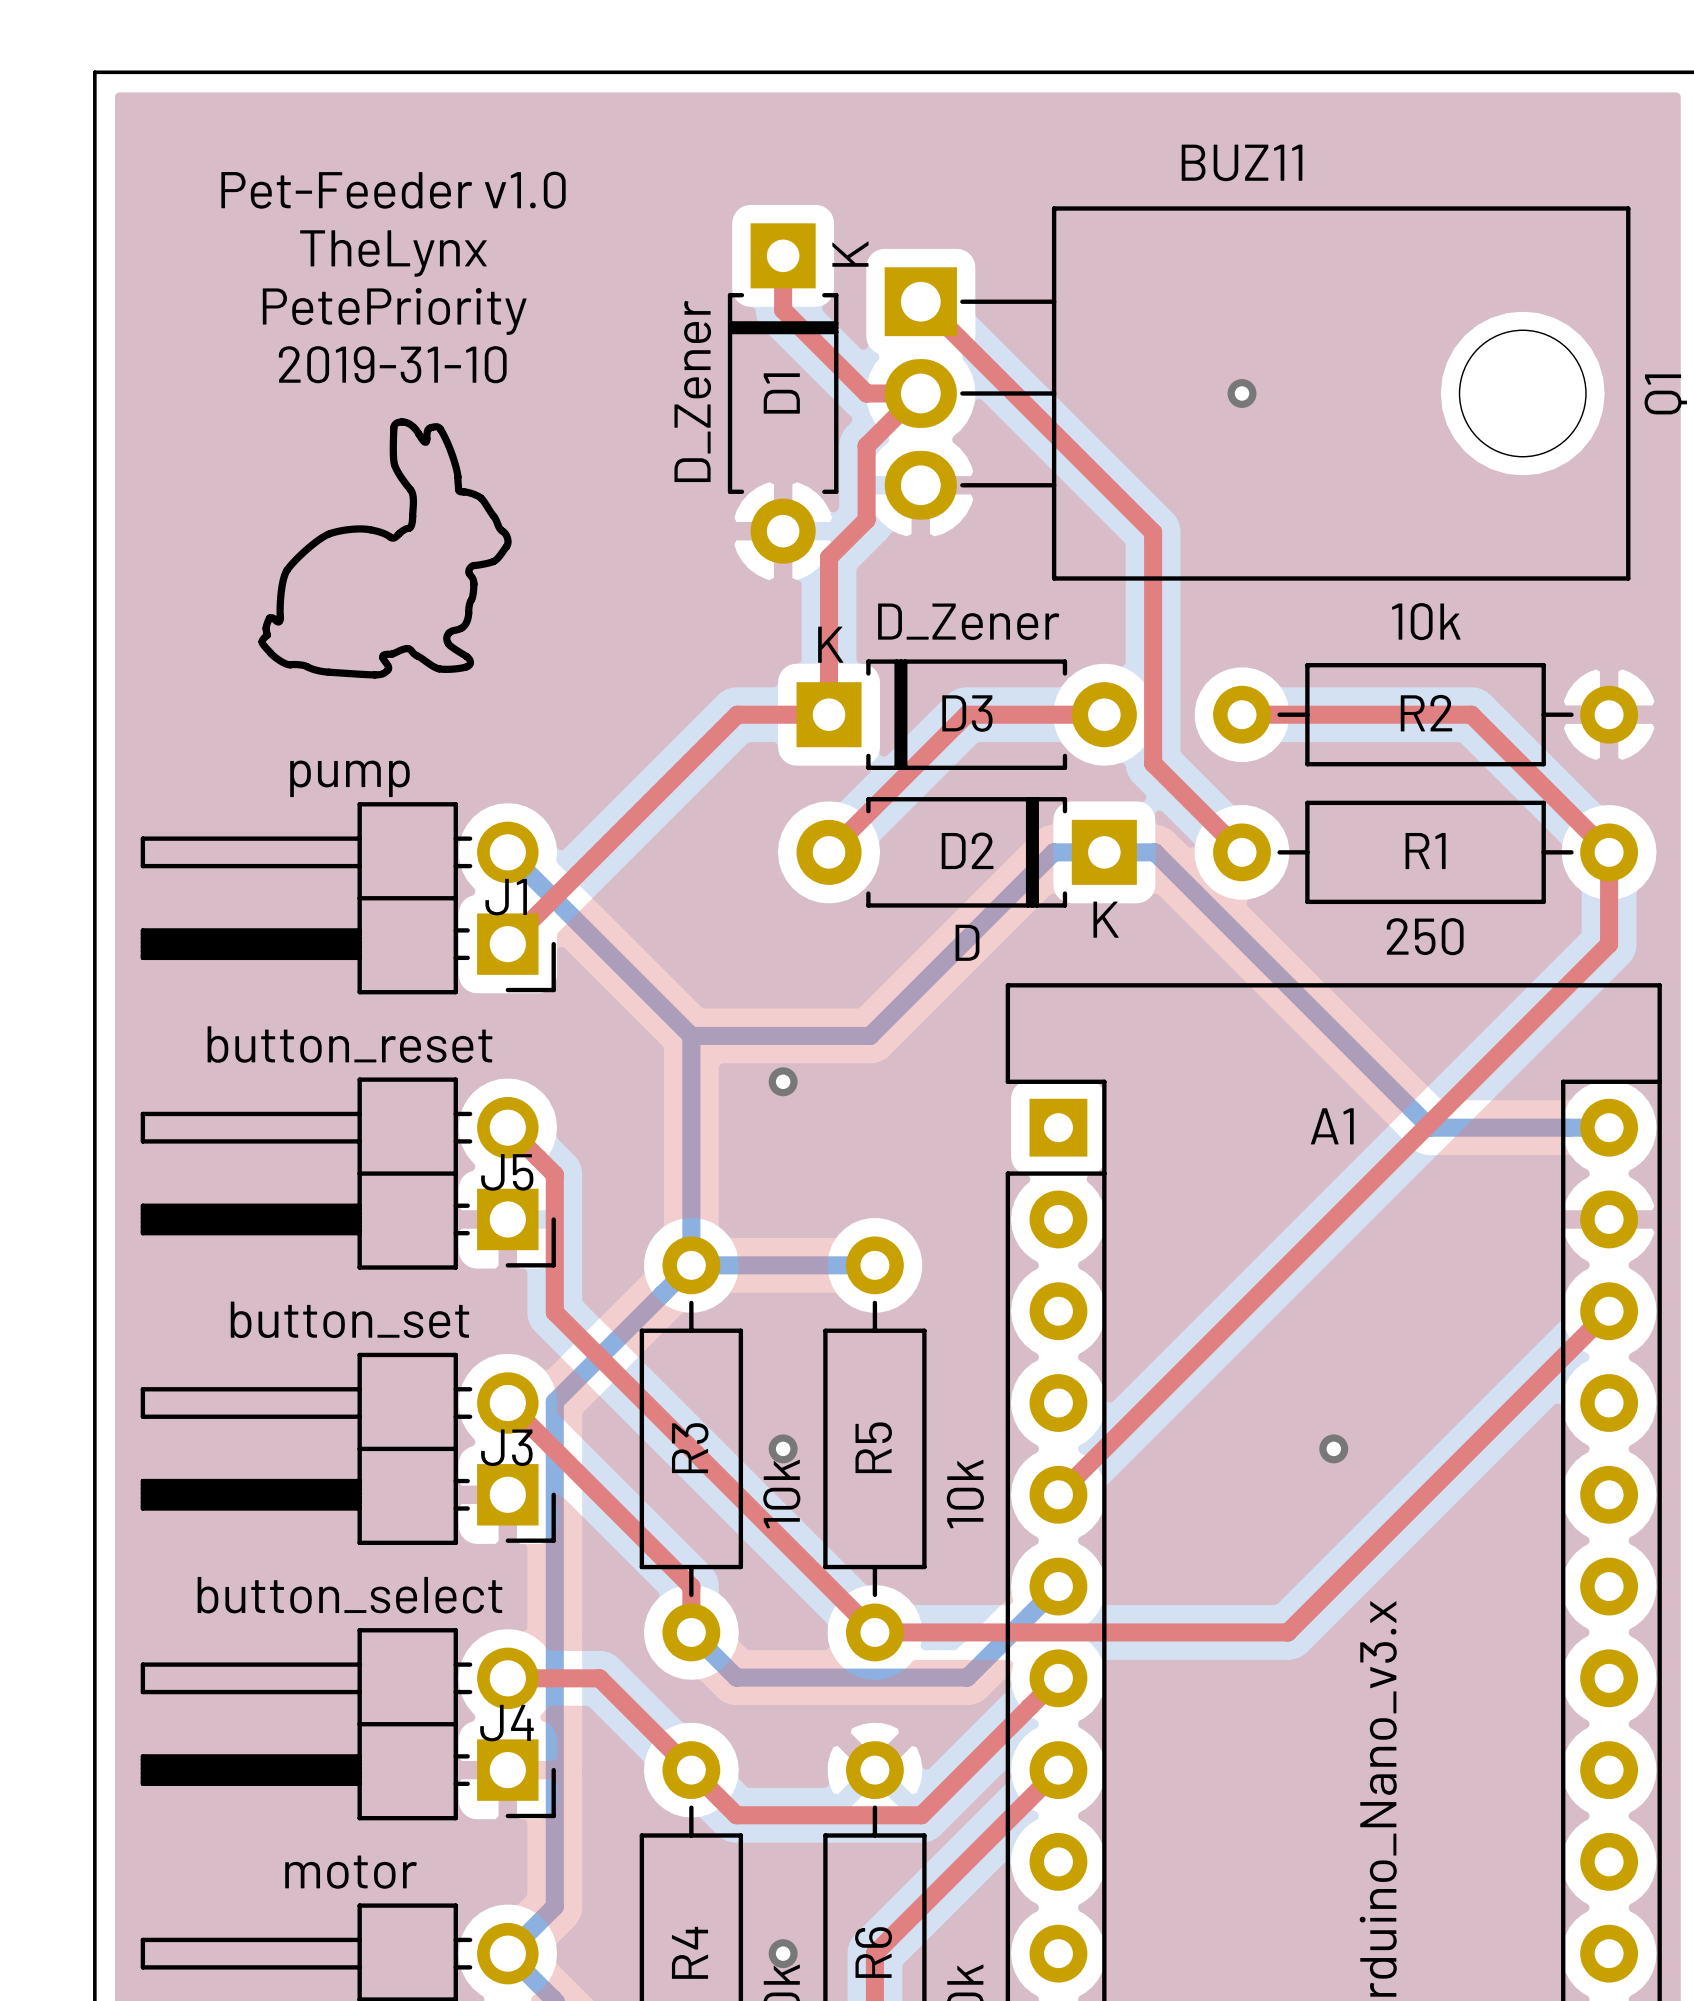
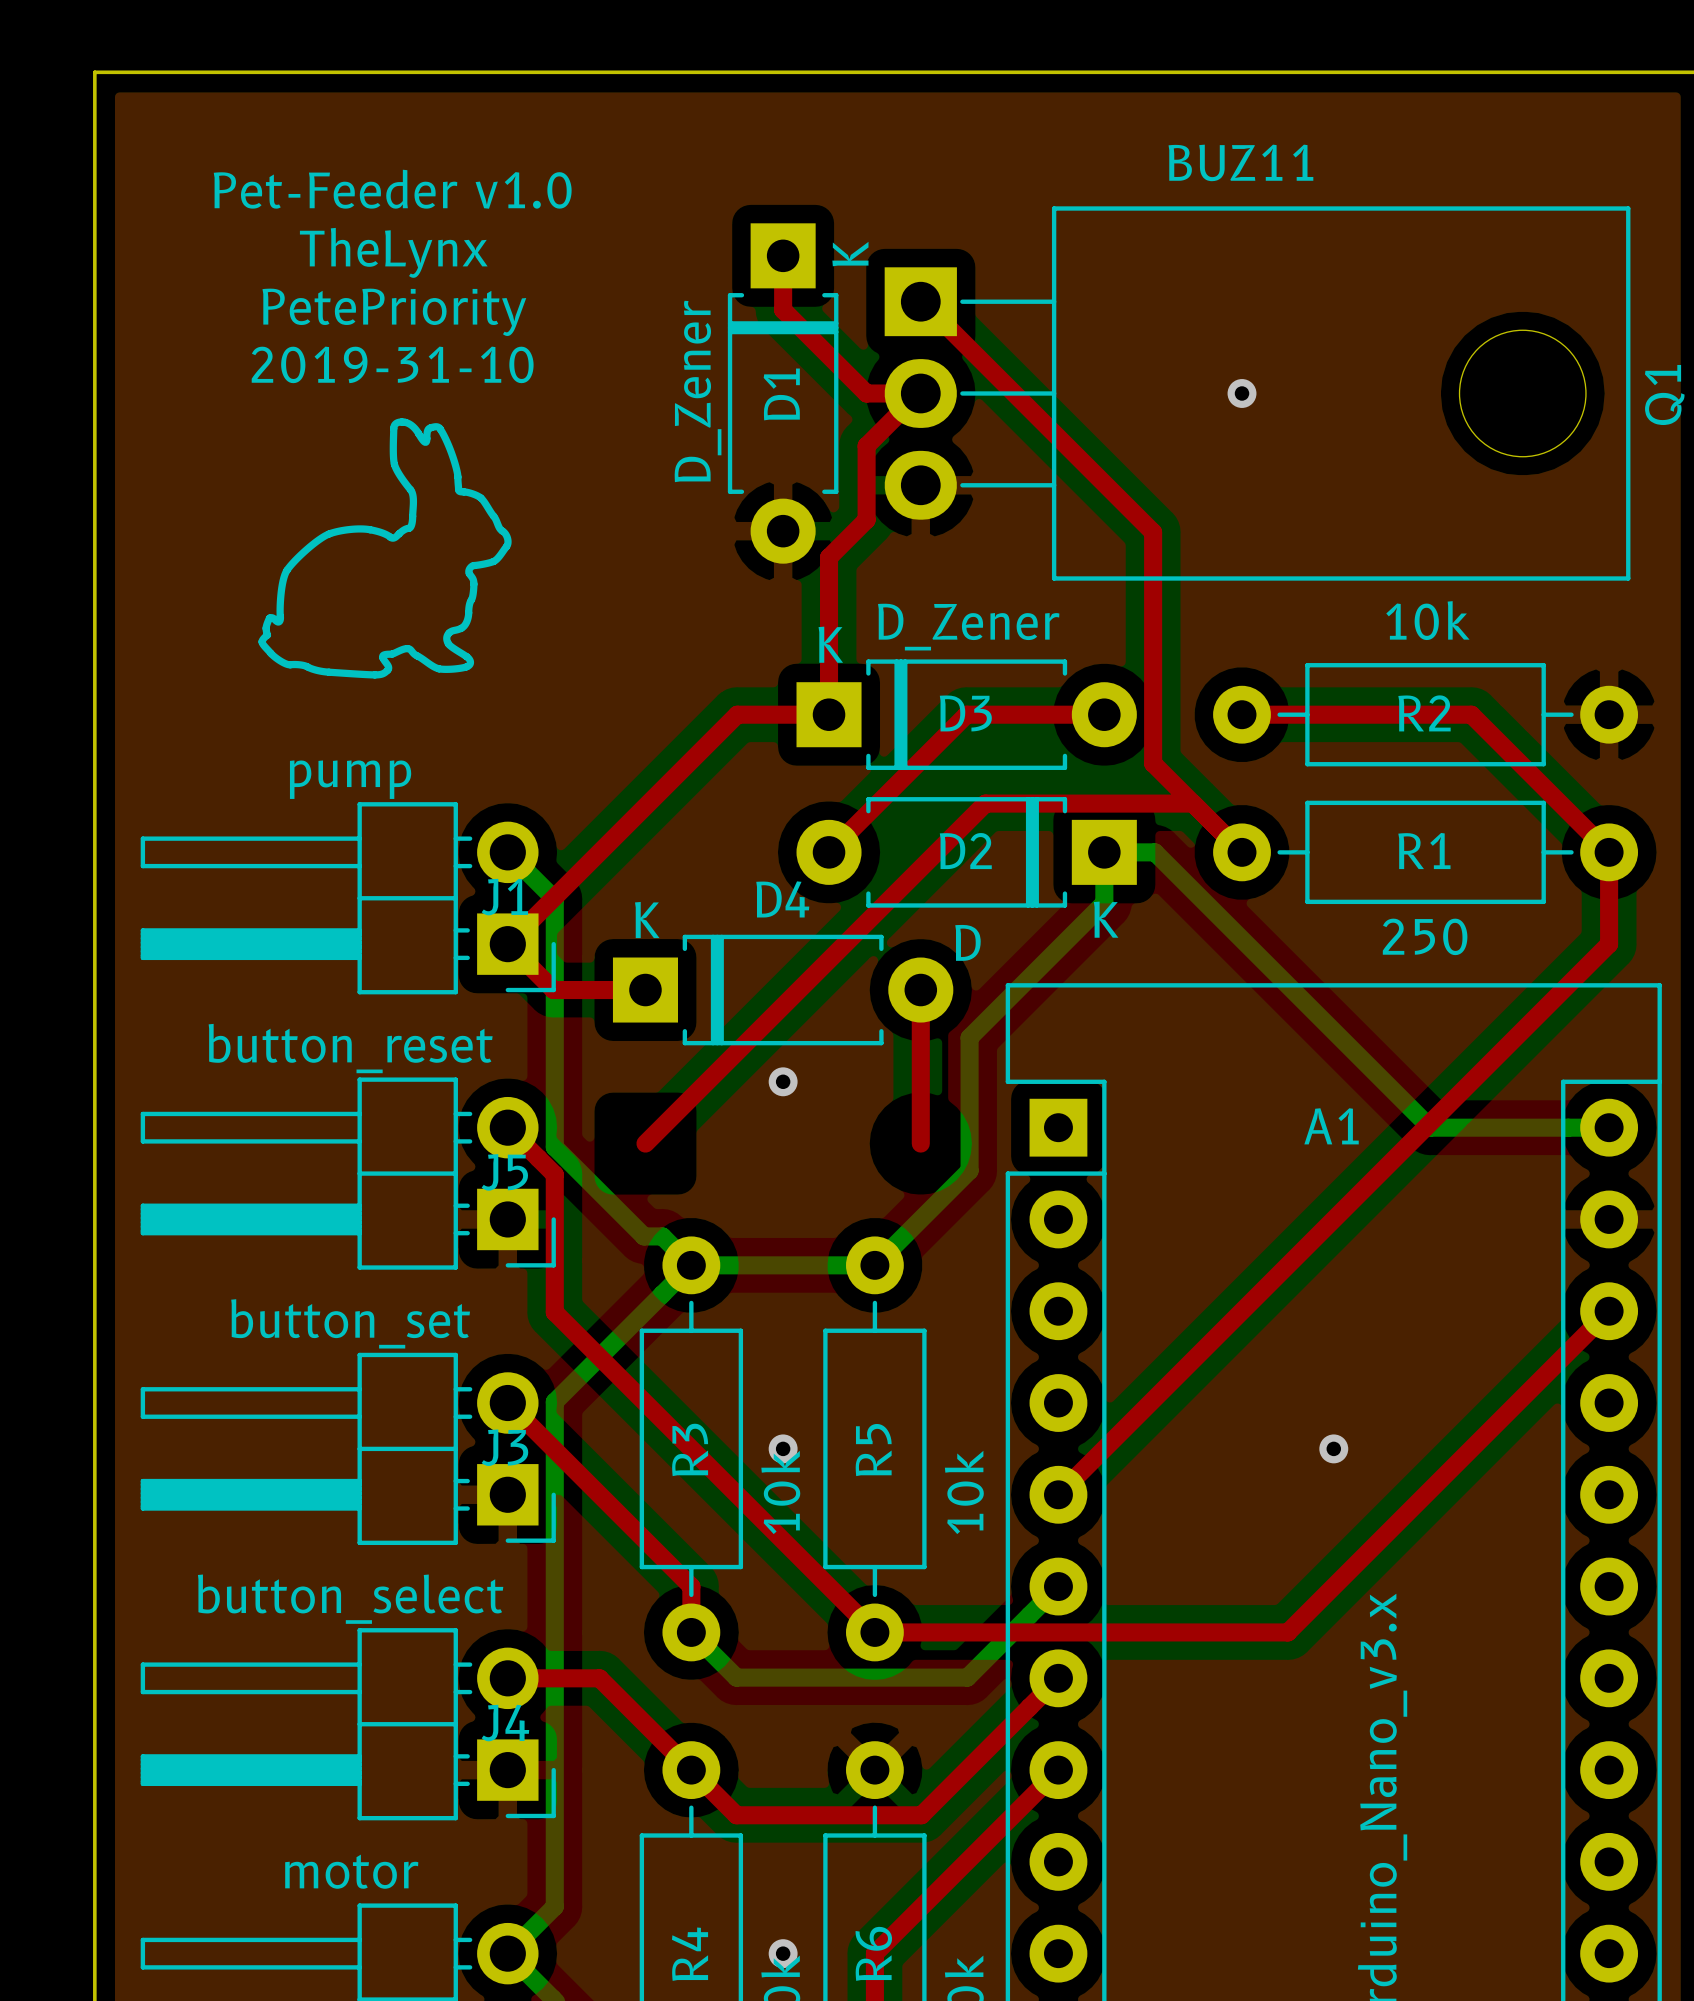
top track: none -> (1193, 803) (985, 803) (645, 1143)
bottom track: (1104, 852) (1053, 852) (870, 1035) (691, 1035) -> (1104, 852) (1104, 902) (969, 1037) (969, 1170) (874, 1265)
bottom track: (554, 899) (691, 1035) -> none
top track: none -> (507, 944) (553, 990) (645, 990)
D4: none -> (783, 990)
top track: none -> (920, 990) (920, 1143)
bottom track: (691, 1035) (691, 1265) -> (554, 899) (554, 1147) (644, 1236) (662, 1236) (691, 1265)

